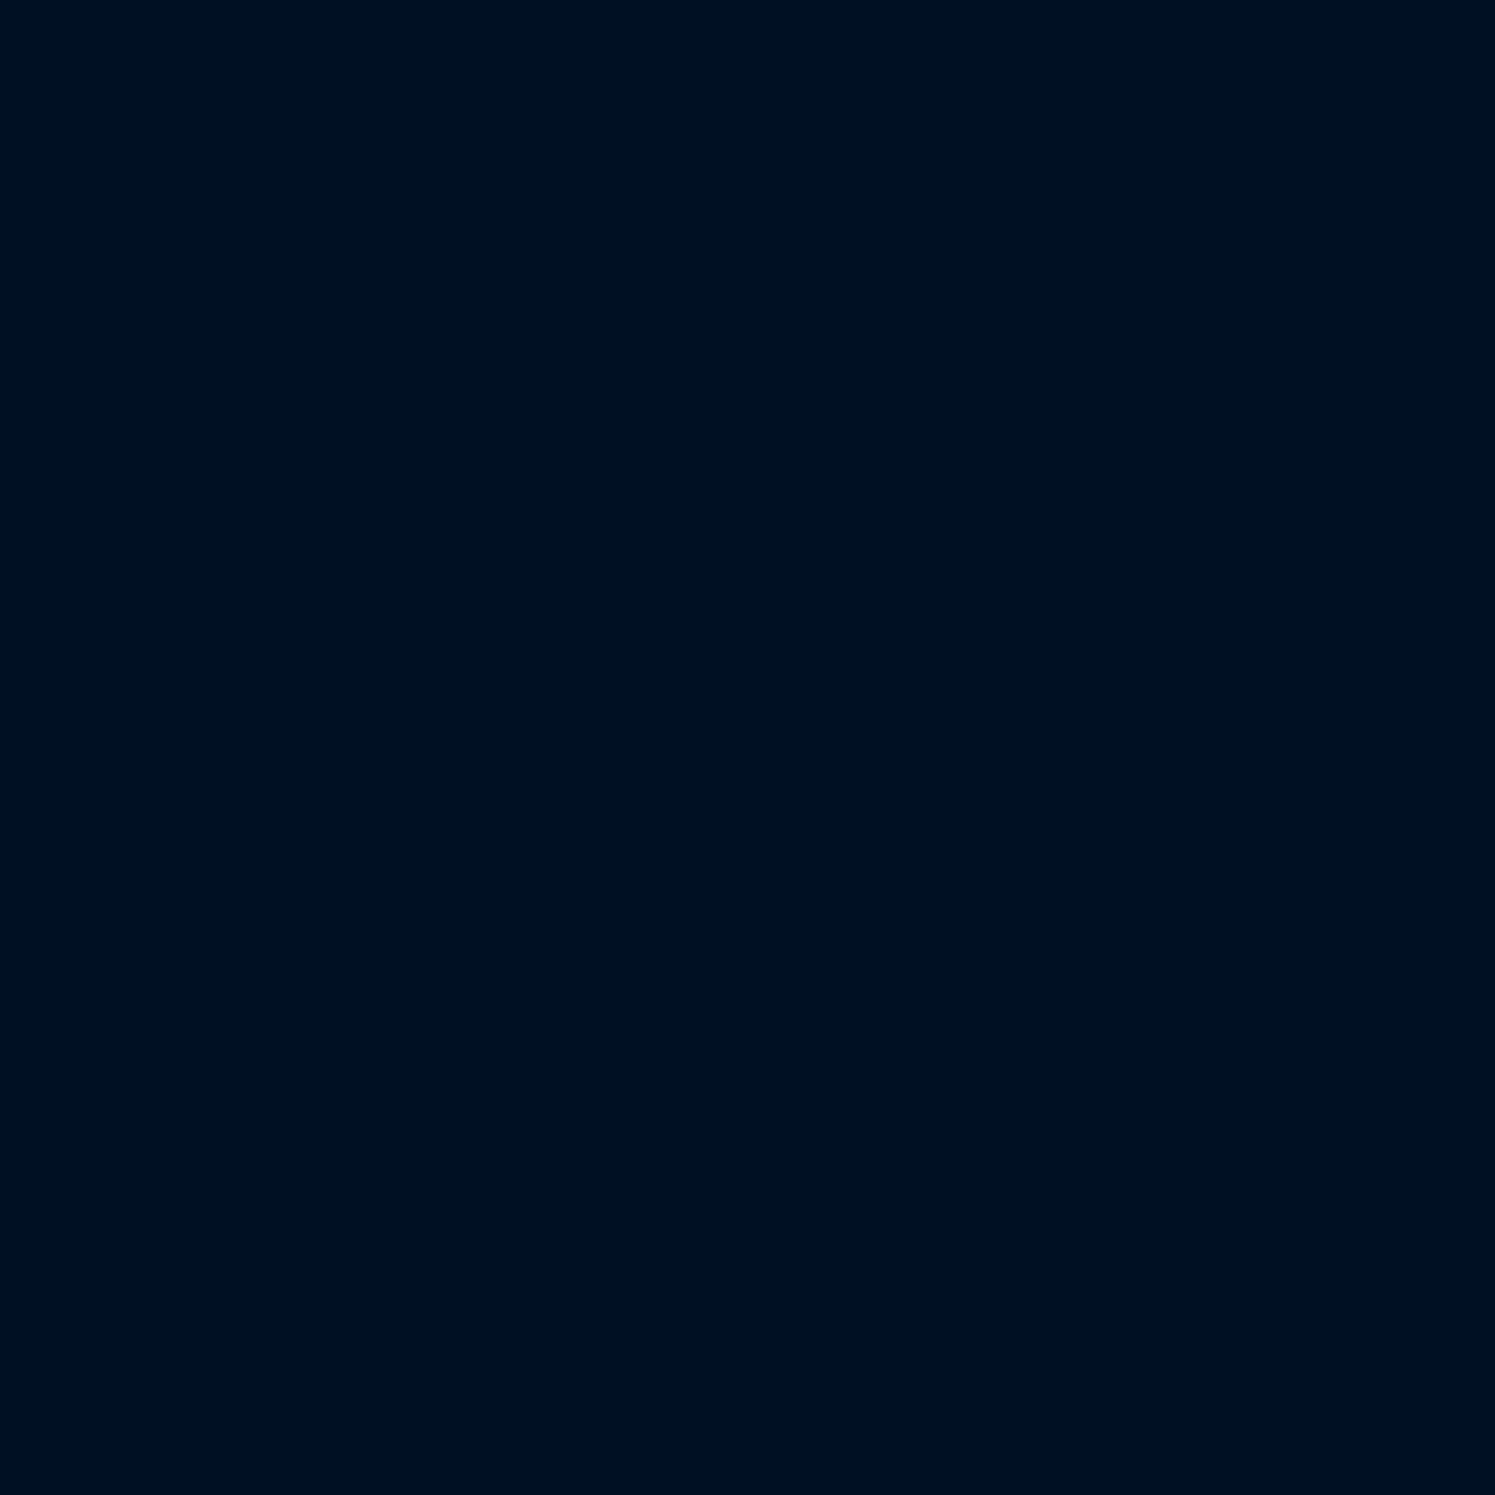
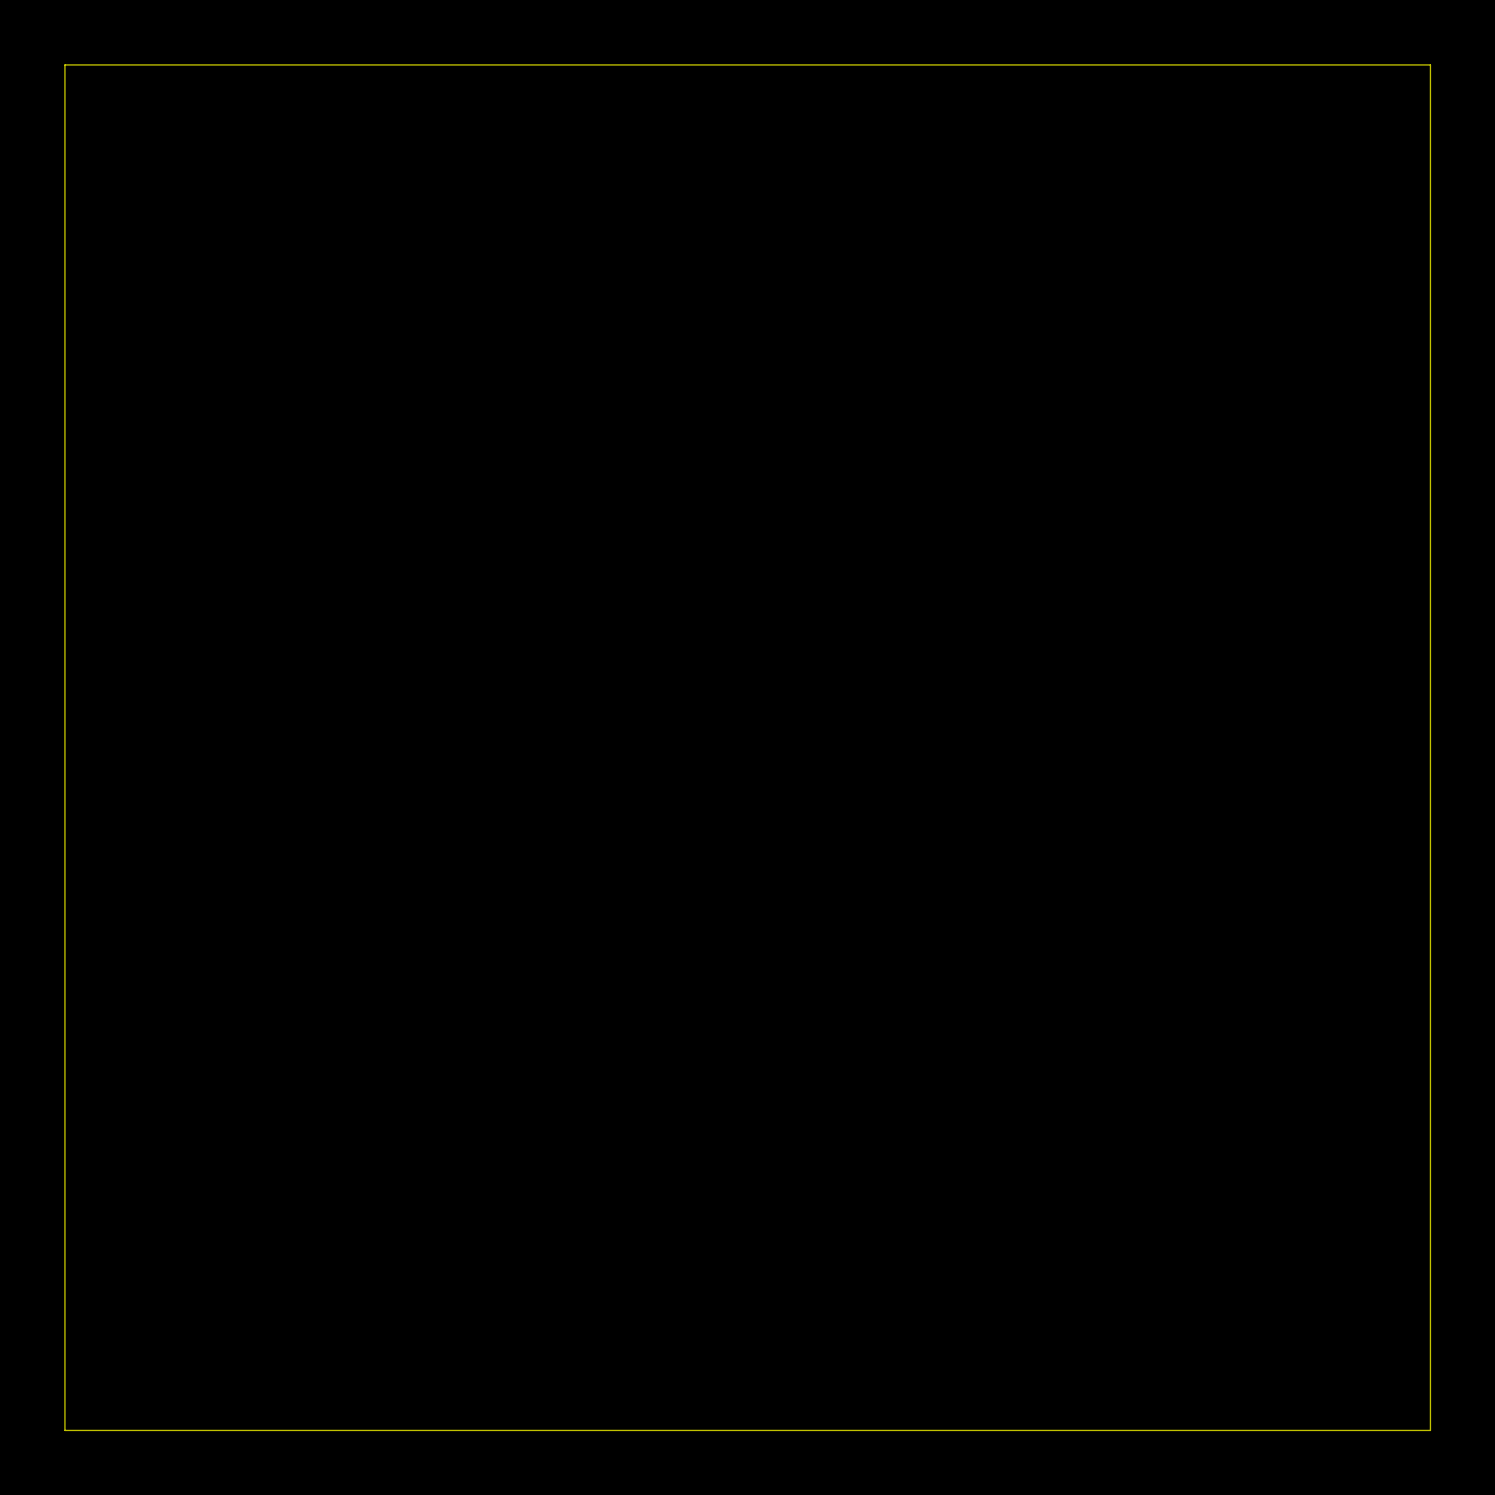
board edge: none -> (1430, 64) (64, 64) (64, 1430) (1430, 1430) (1430, 64)

